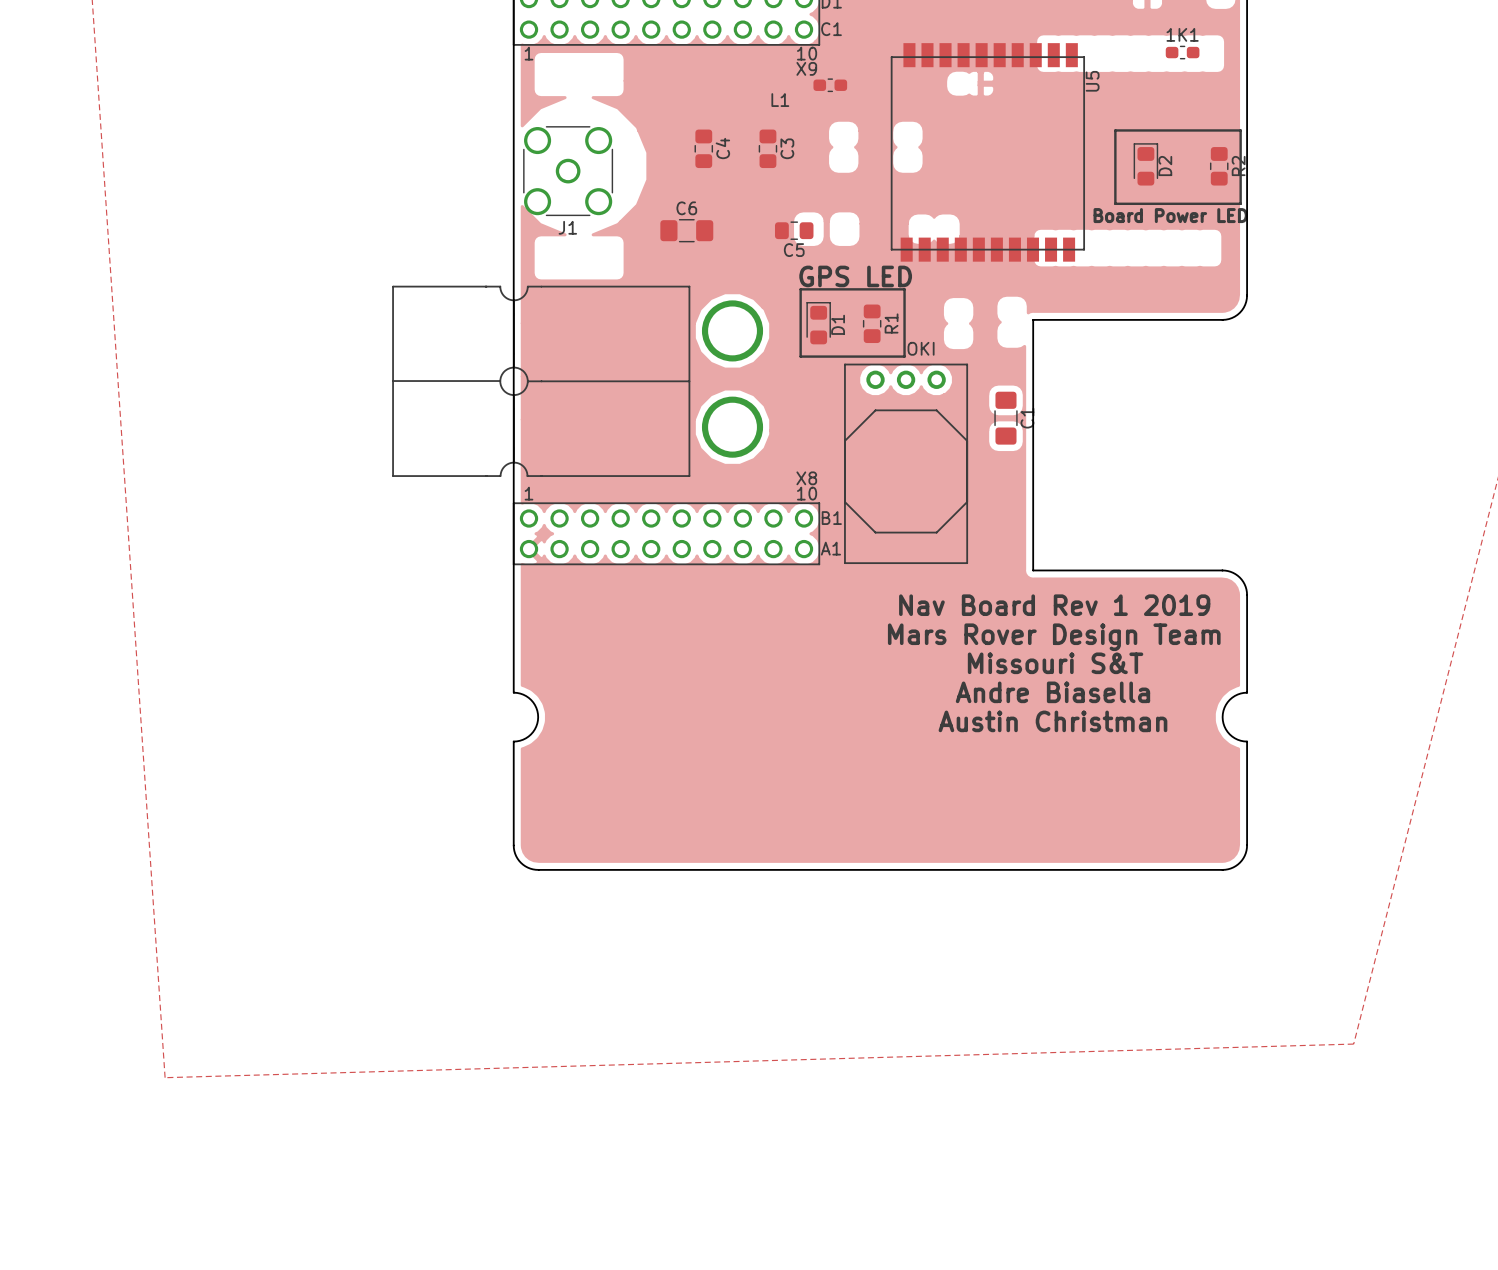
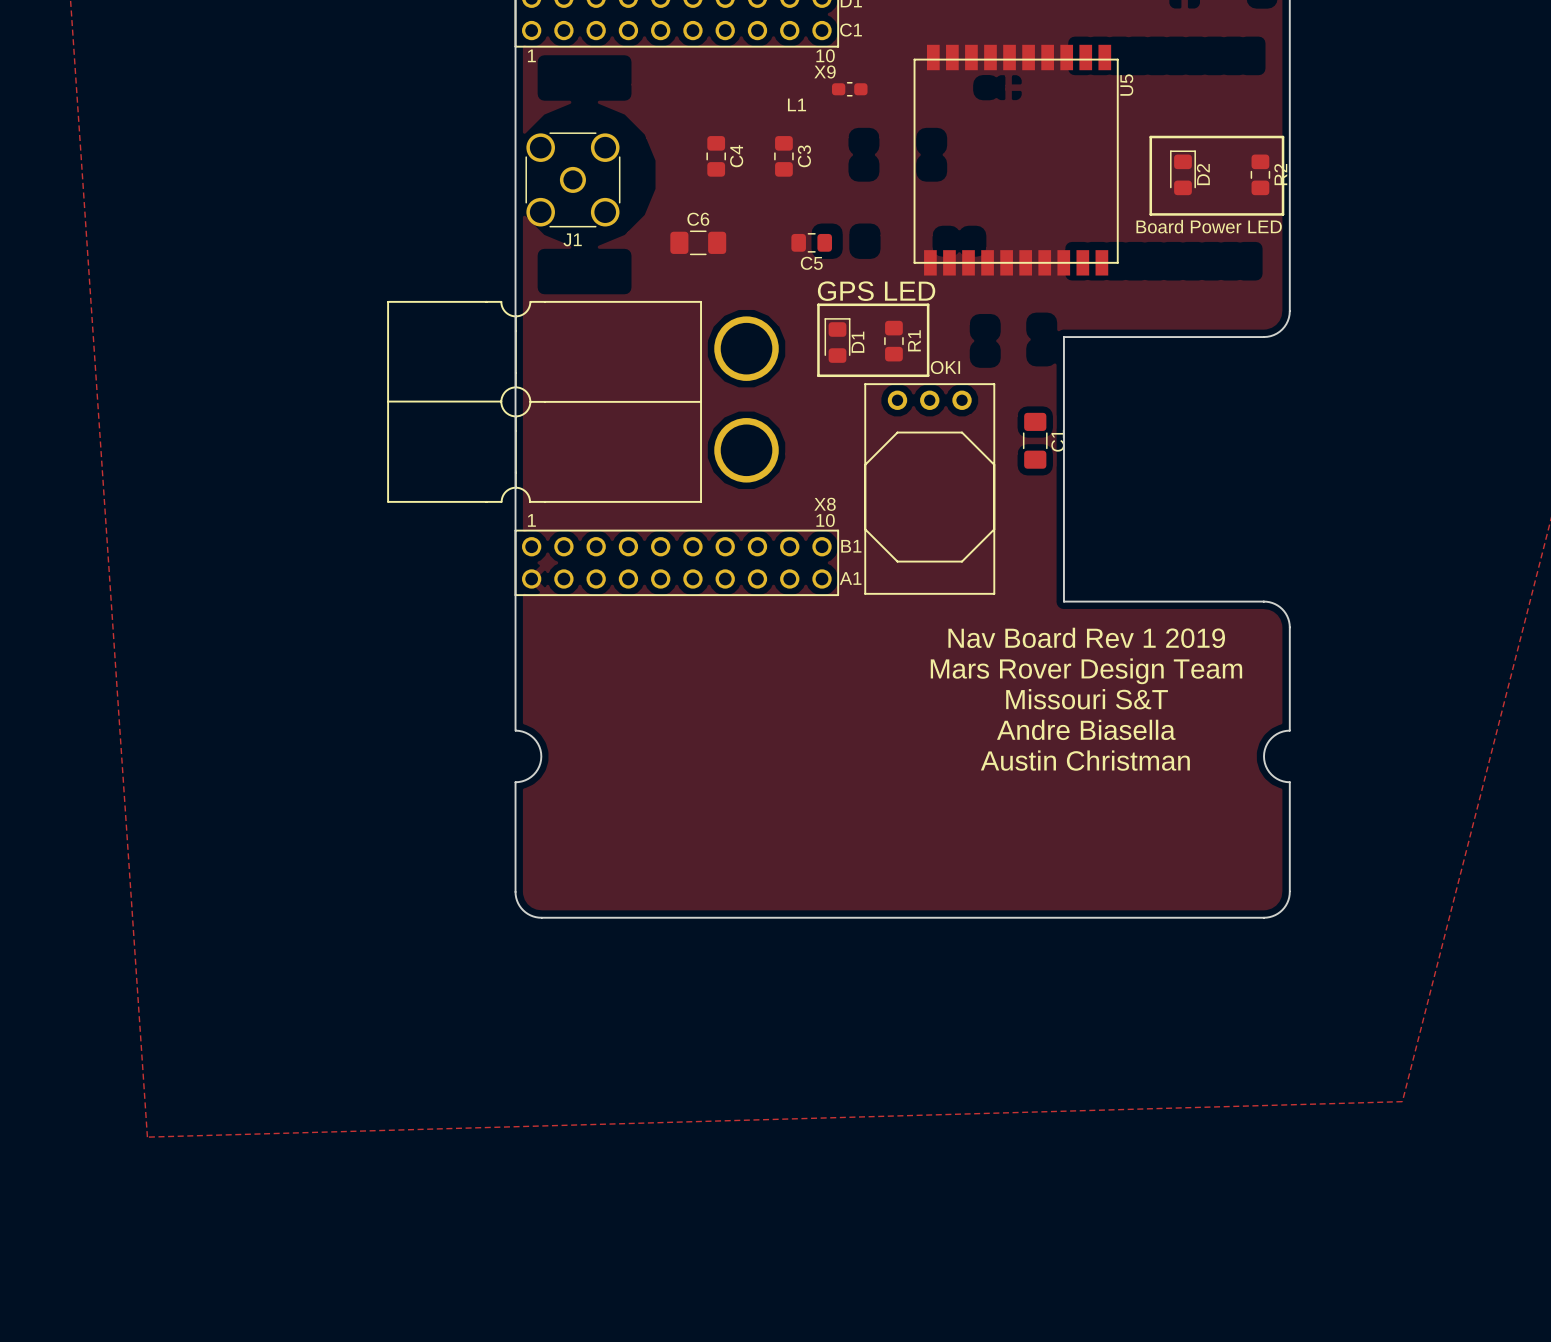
1K1: (1182, 52) -> none

